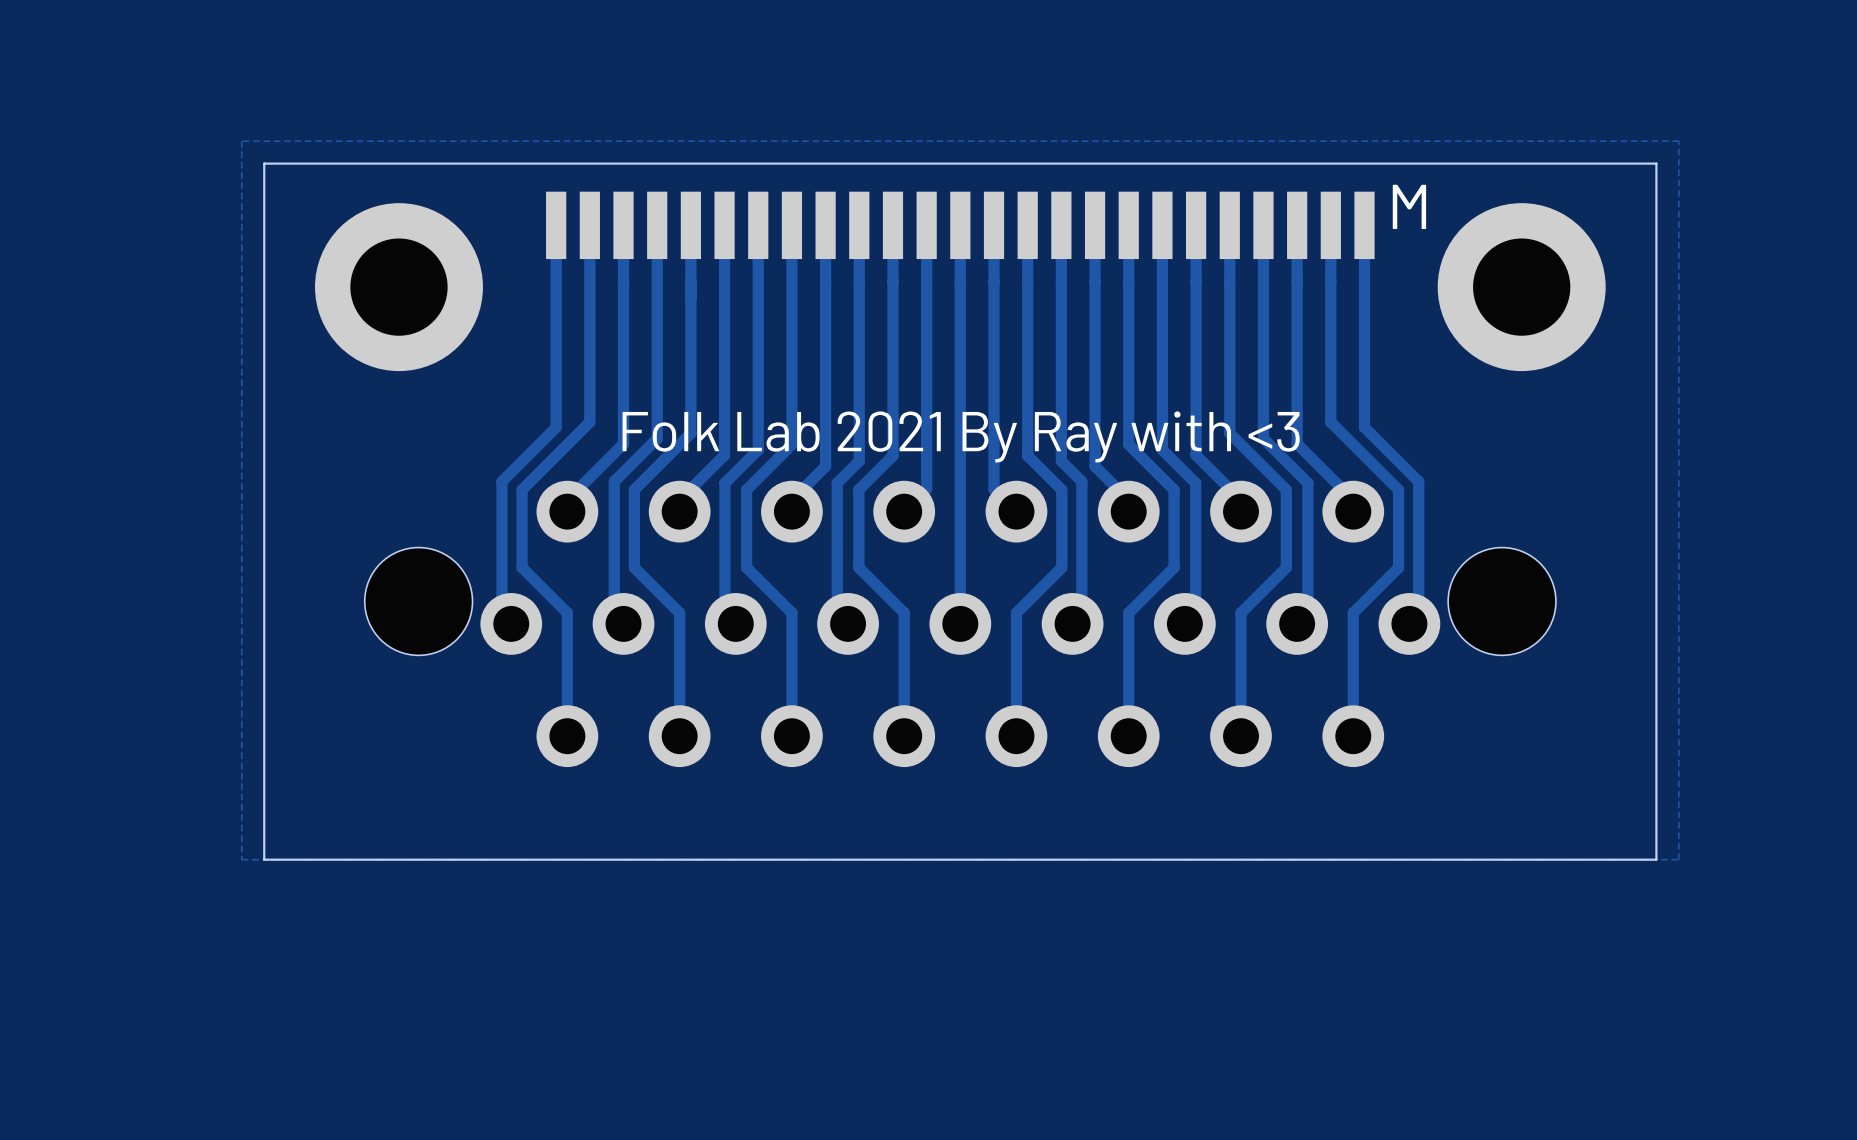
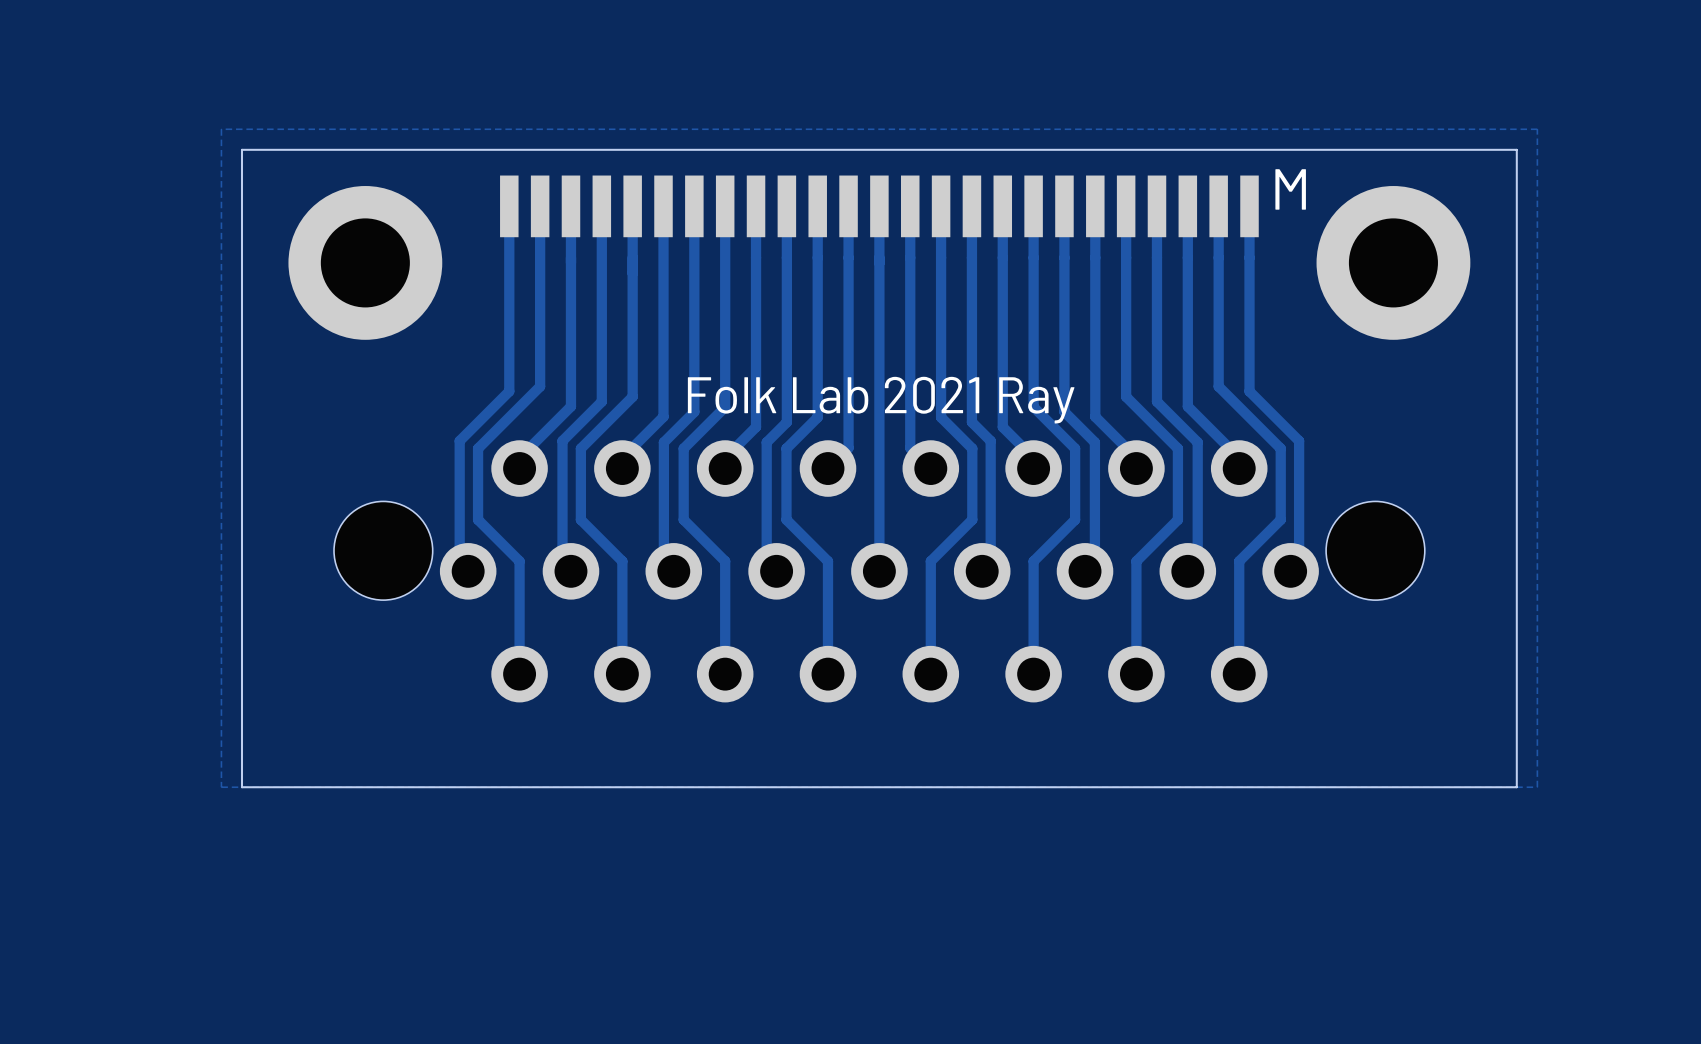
text: Folk Lab 2021 By Ray with <3 (961, 436) -> Folk Lab 2021 Ray (881, 400)

